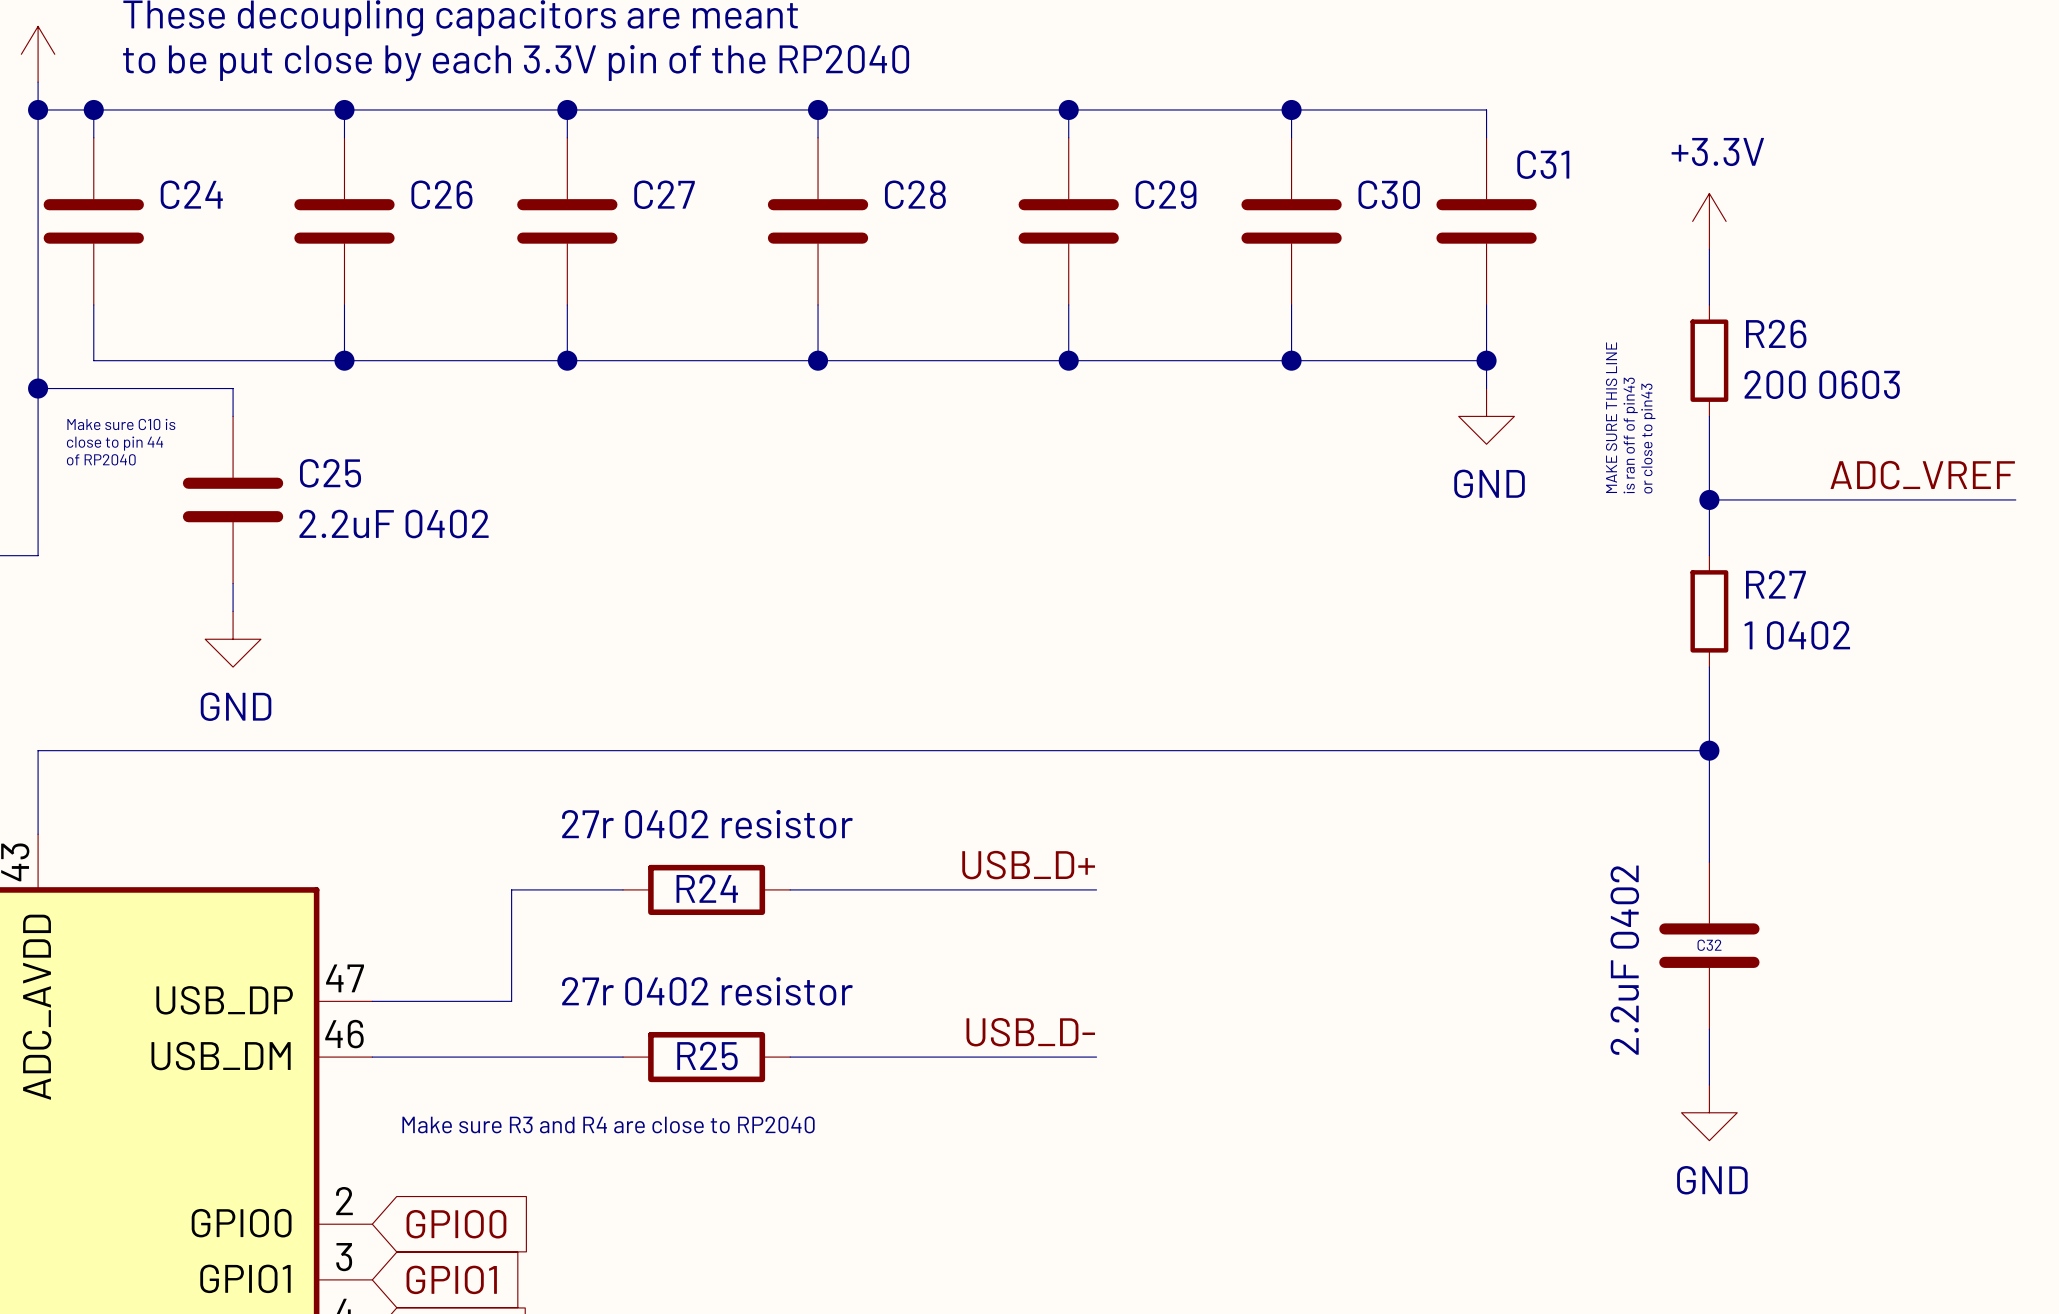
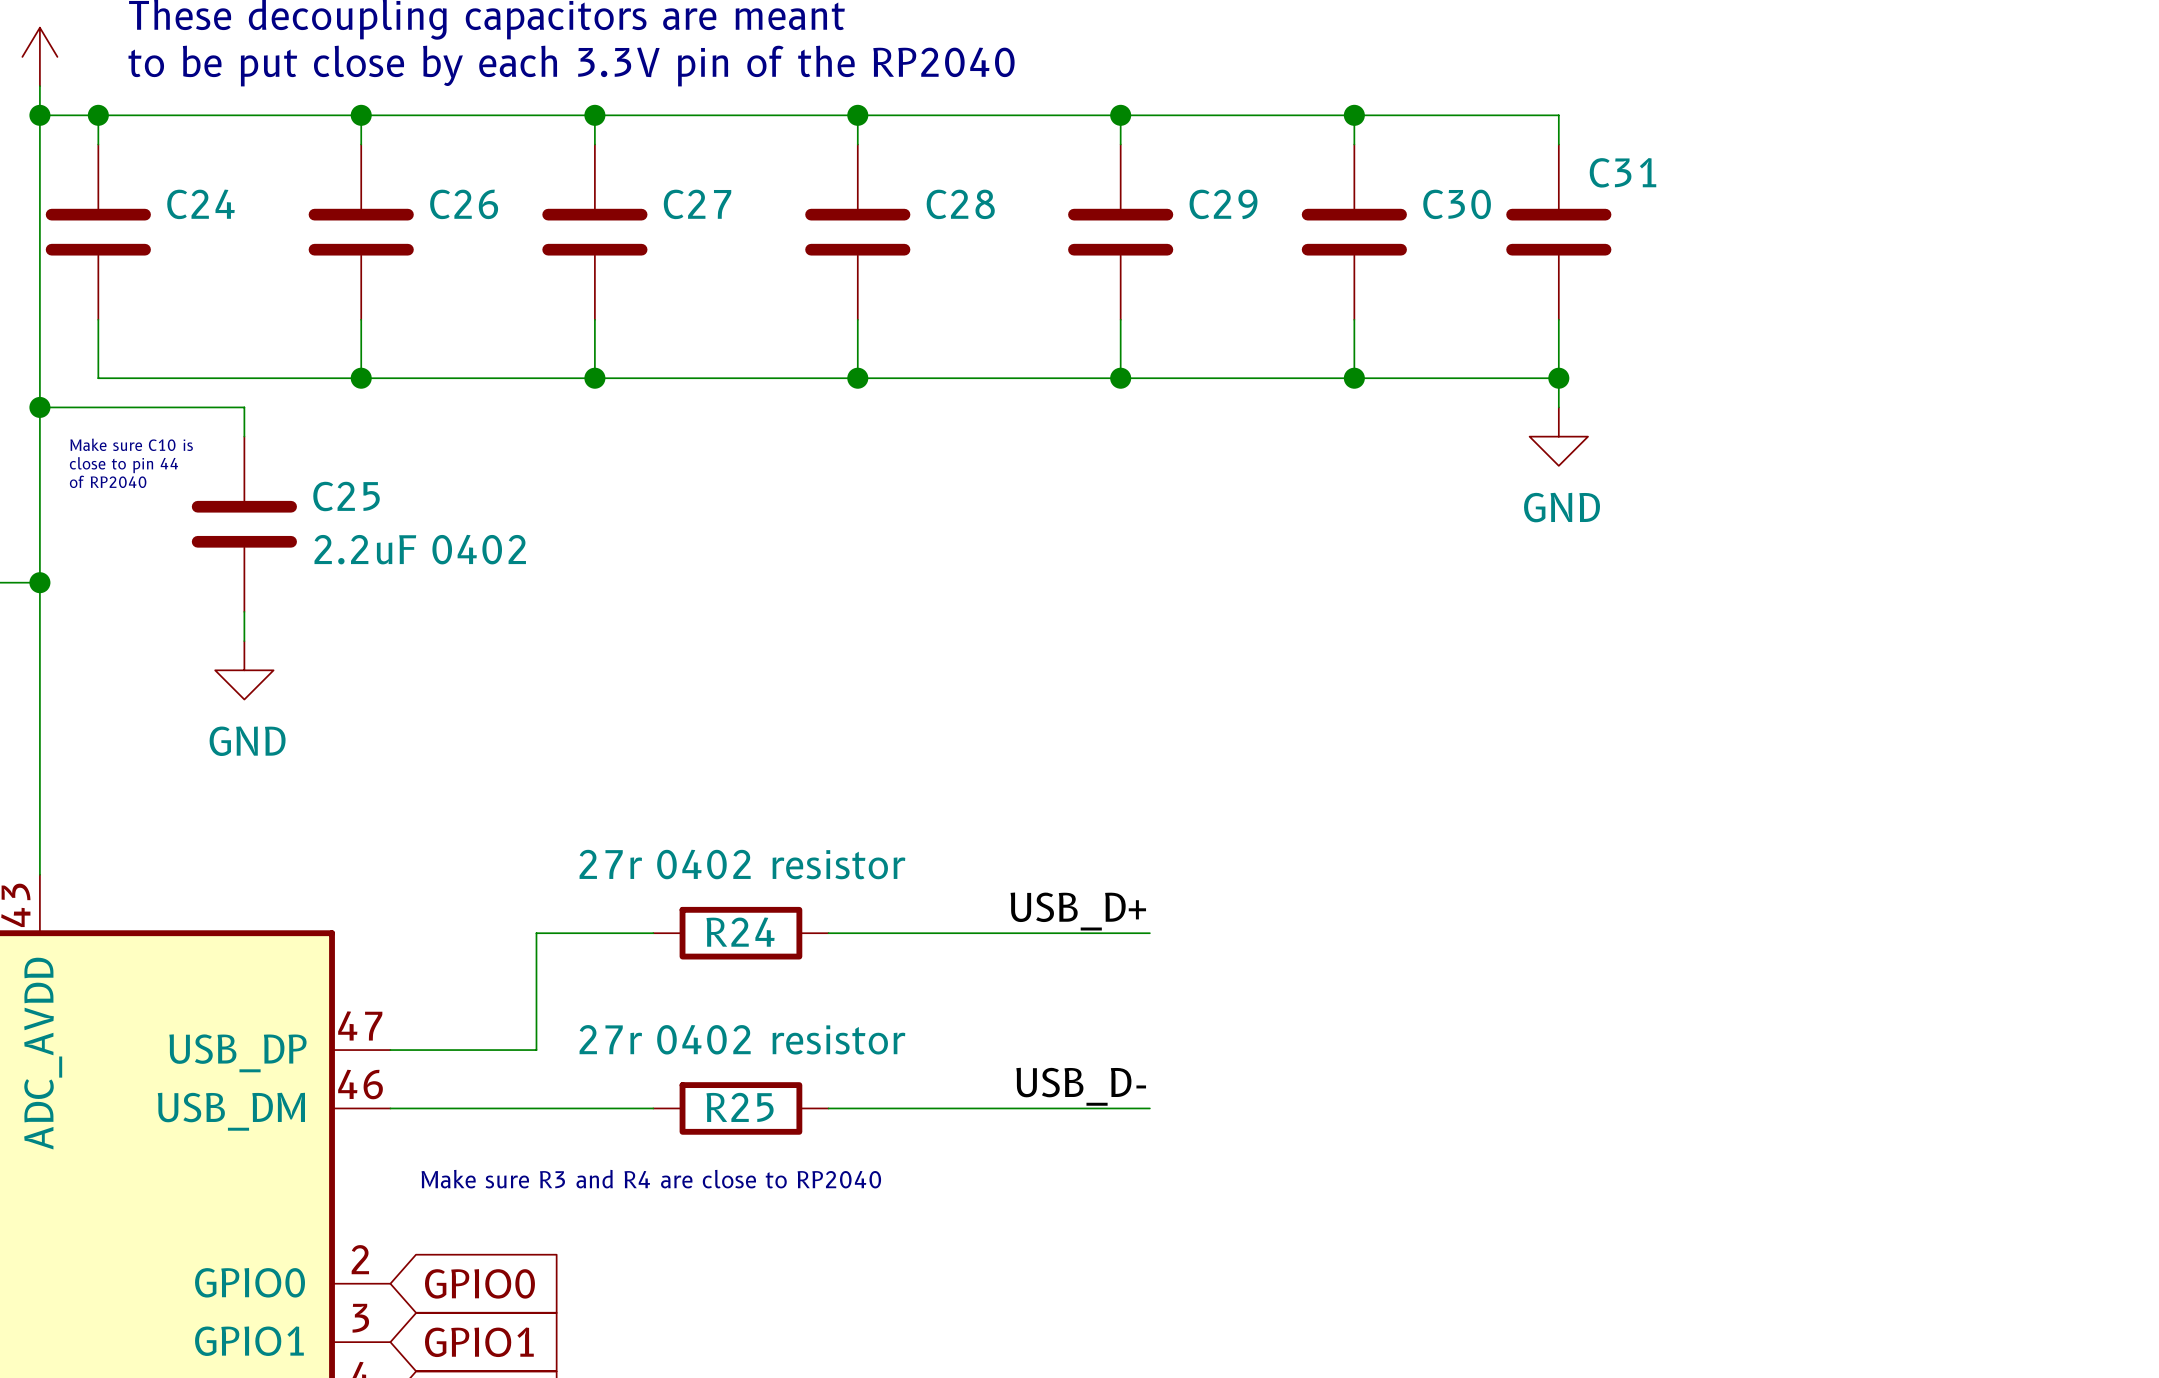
power symbol: +3.3V (1709, 221) -> none
wire: (1709, 249) (1709, 304) -> none
R26: 200 0603 (1709, 360) -> none
wire: (1709, 416) (1709, 555) -> none
text: MAKE SURE THIS LINE (1611, 417) -> none
text: is ran off of pin43 (1630, 435) -> none
text: or close to pin43 (1648, 438) -> none
label: ADC_VREF (1922, 475) -> none
wire: (1709, 499) (2015, 499) -> none
junction: (1709, 499) -> none
junction: none -> (39, 582)
R27: 1 0402 (1709, 611) -> none
wire: (1709, 667) (1709, 862) -> none
wire: (38, 750) (1709, 750) -> (39, 787) (39, 582)
junction: (1709, 750) -> none
C32: 2.2uF 0402 (1709, 945) -> none
wire: (1709, 1029) (1709, 1084) -> none
power symbol: GND (1709, 1112) -> none

